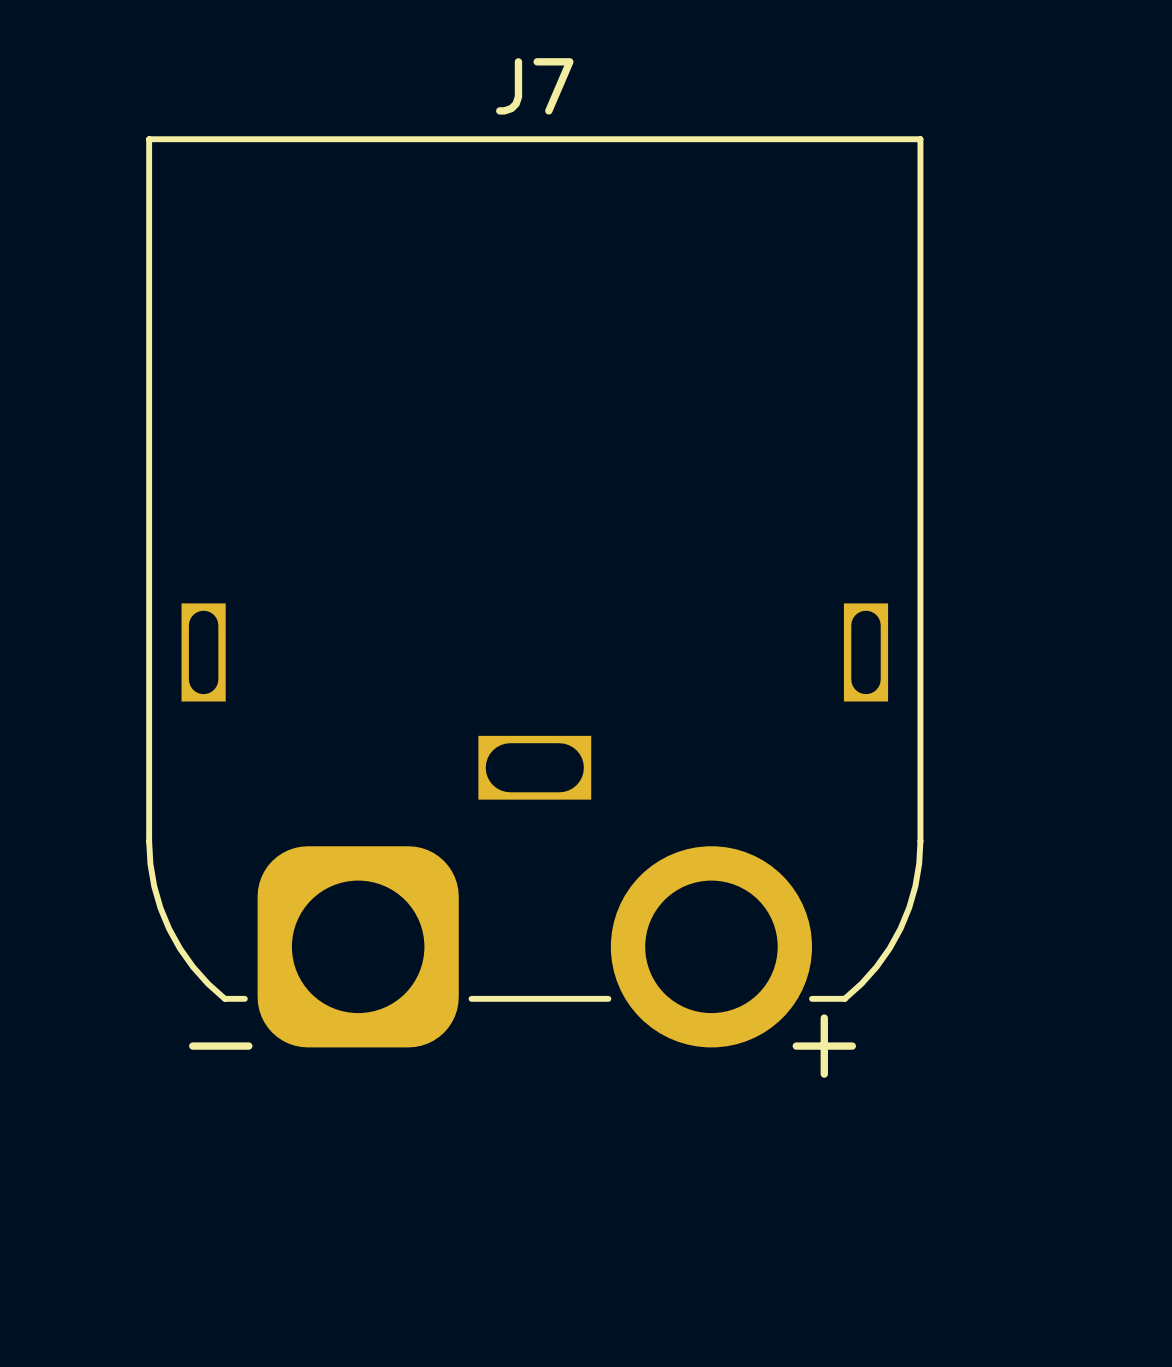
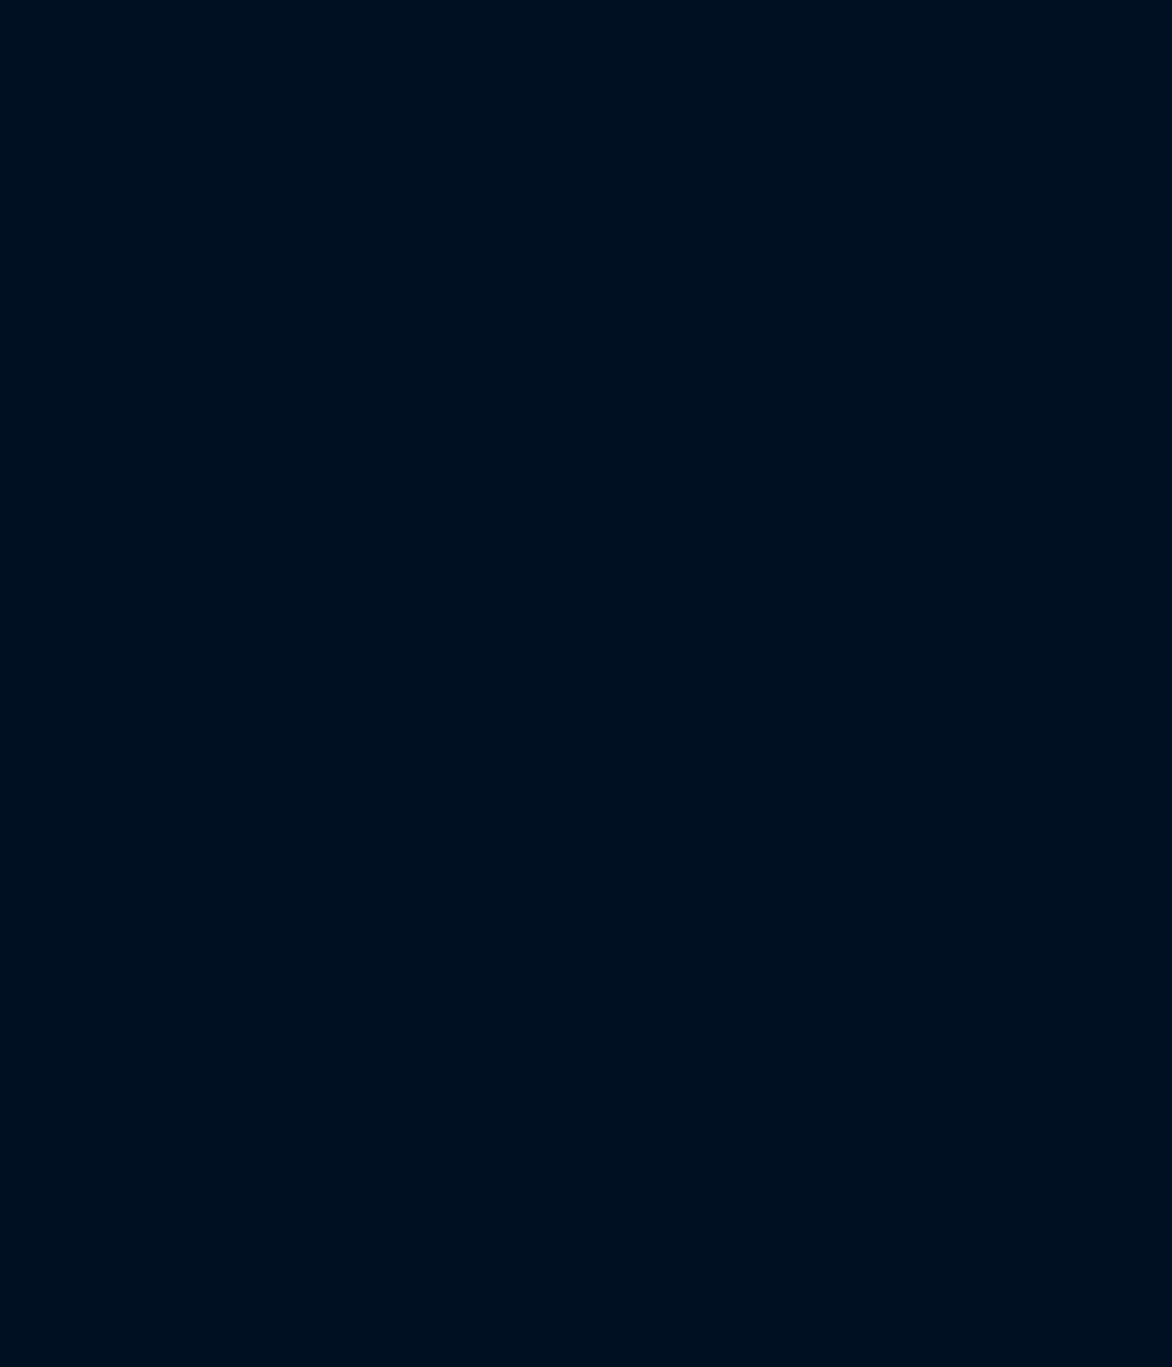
J7: (534, 591) -> none

